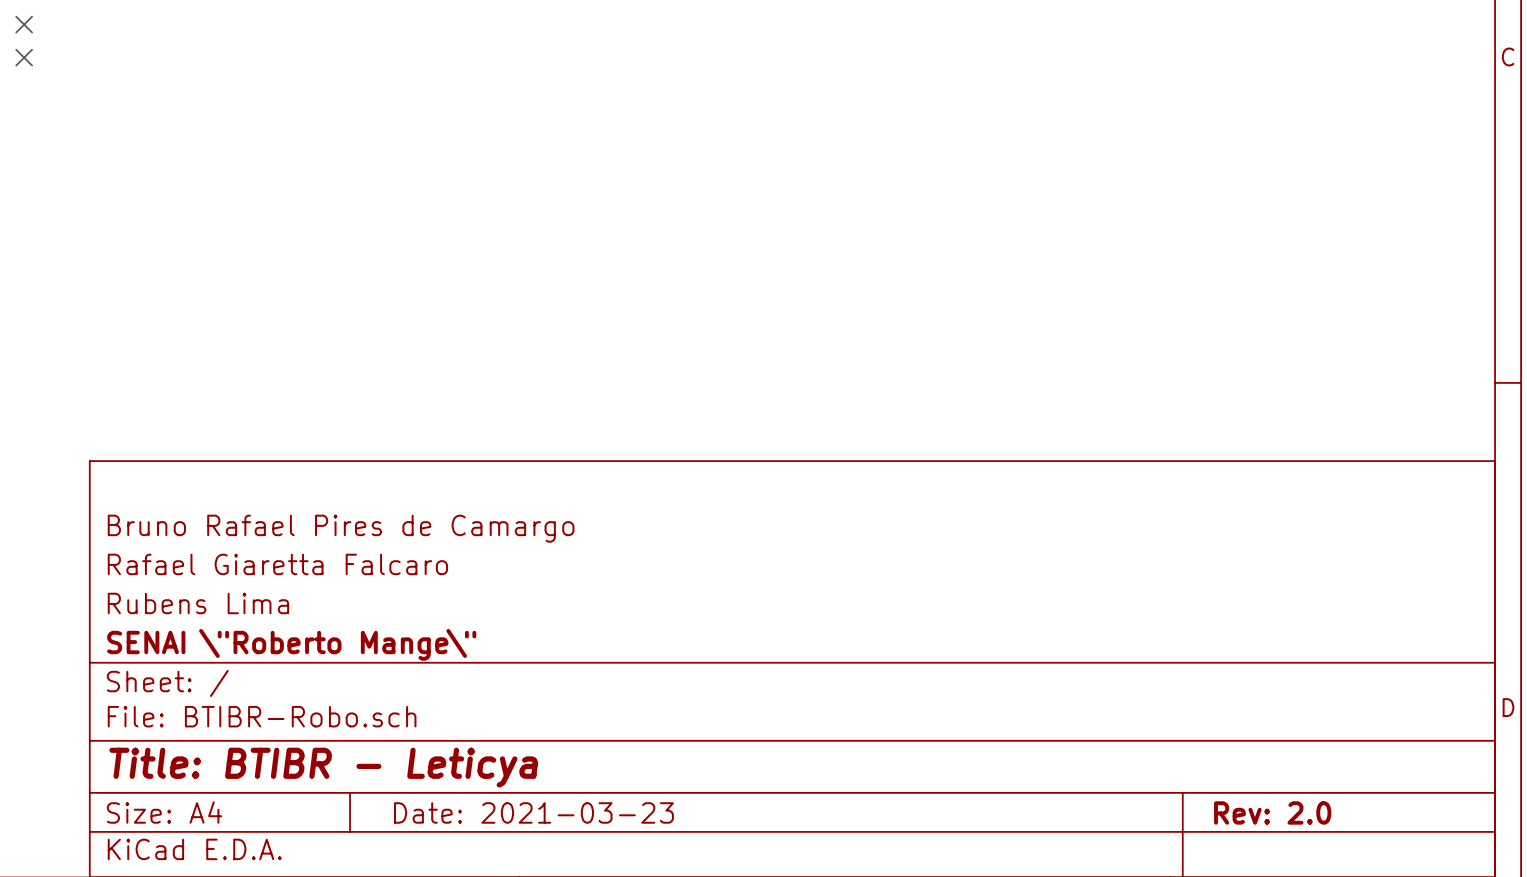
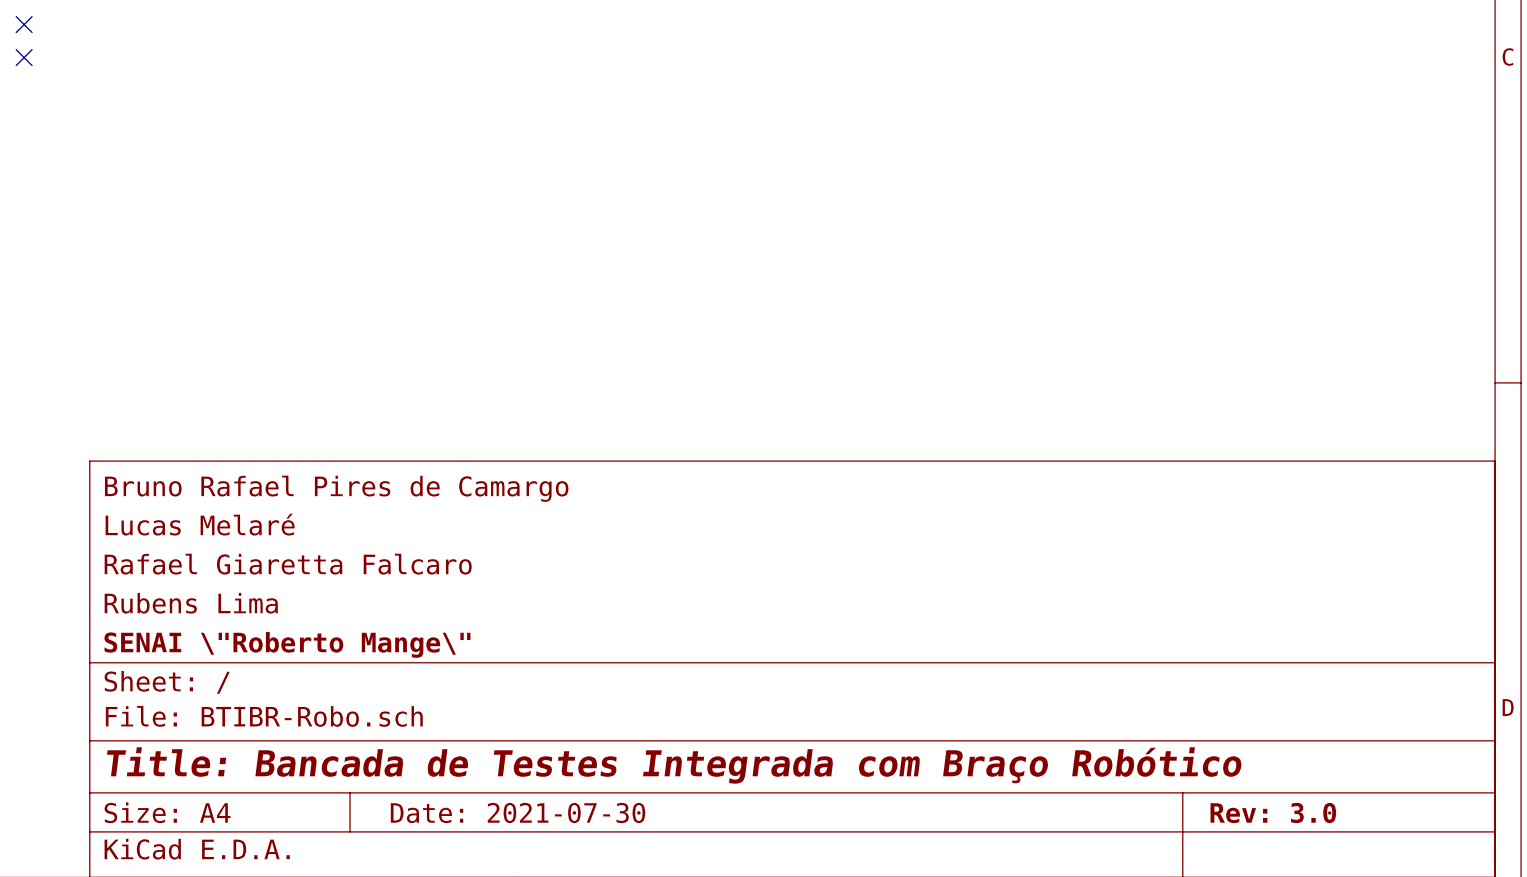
title block: none -> Bruno Rafael Pires de Camargo (336, 488)
title block: Bruno Rafael Pires de Camargo (341, 528) -> Lucas Melaré (200, 524)
title block: Title: BTIBR - Leticya (323, 767) -> Title: Bancada de Testes Integrada com Braço Robótico (674, 765)
title block: Date: 2021-03-23 (533, 812) -> Date: 2021-07-30 (518, 812)
title block: Rev: 2.0 (1272, 812) -> Rev: 3.0 (1273, 812)

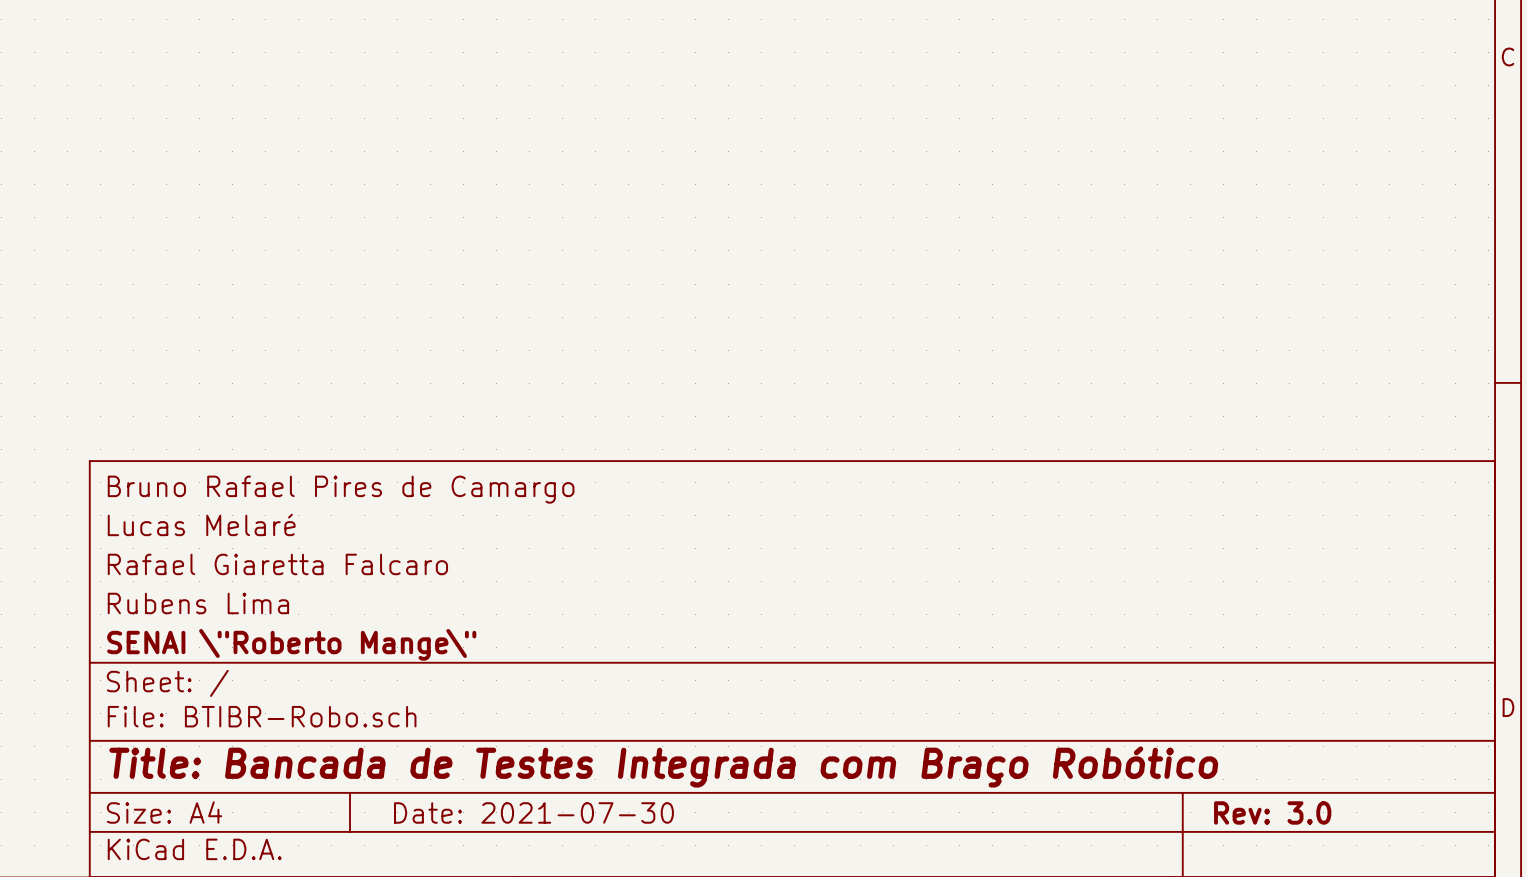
no-connect mark: (24, 24) -> none
no-connect mark: (24, 57) -> none

